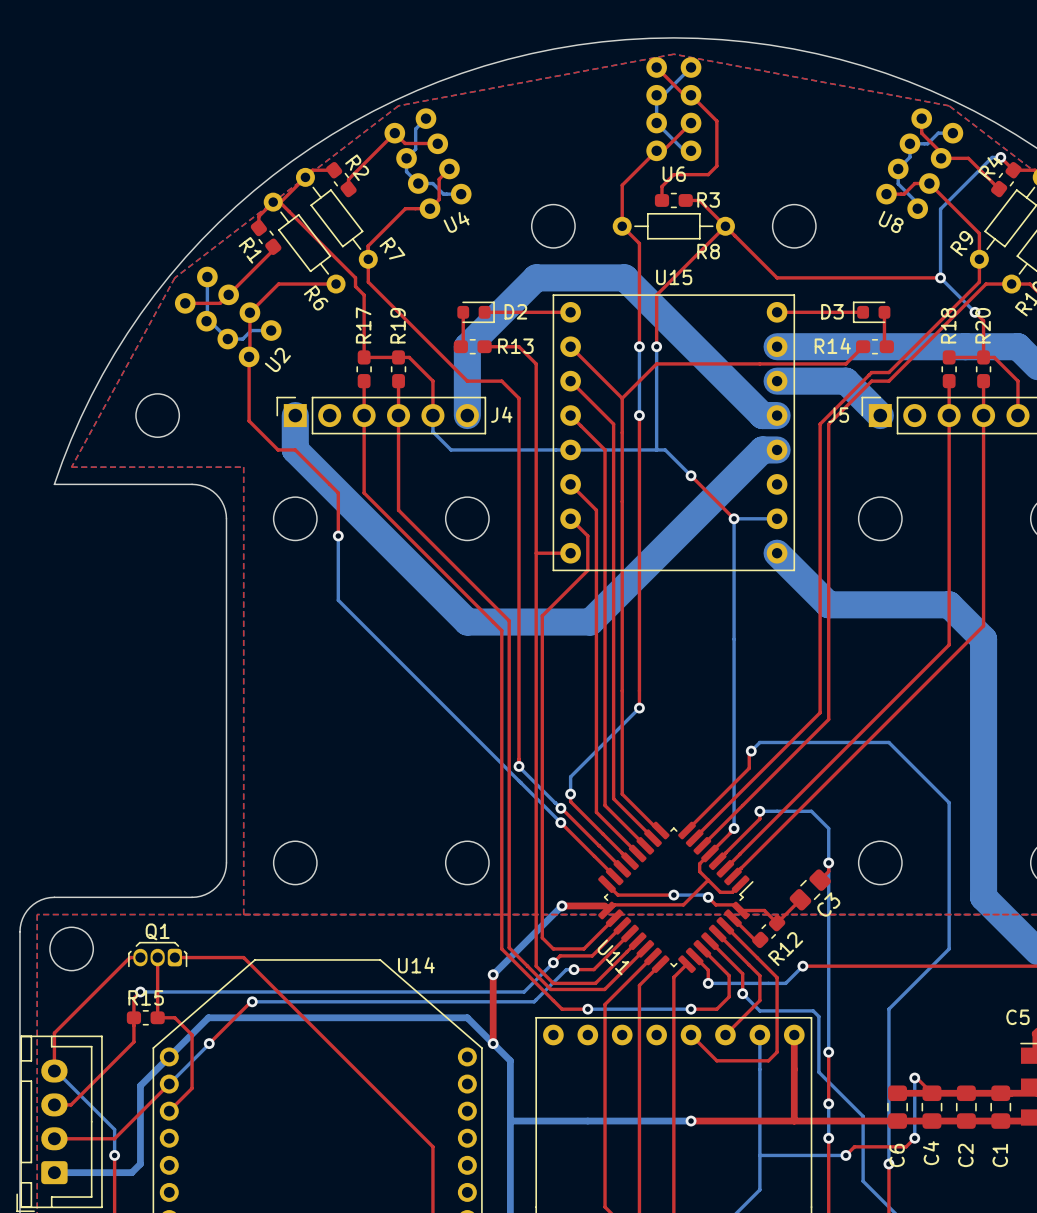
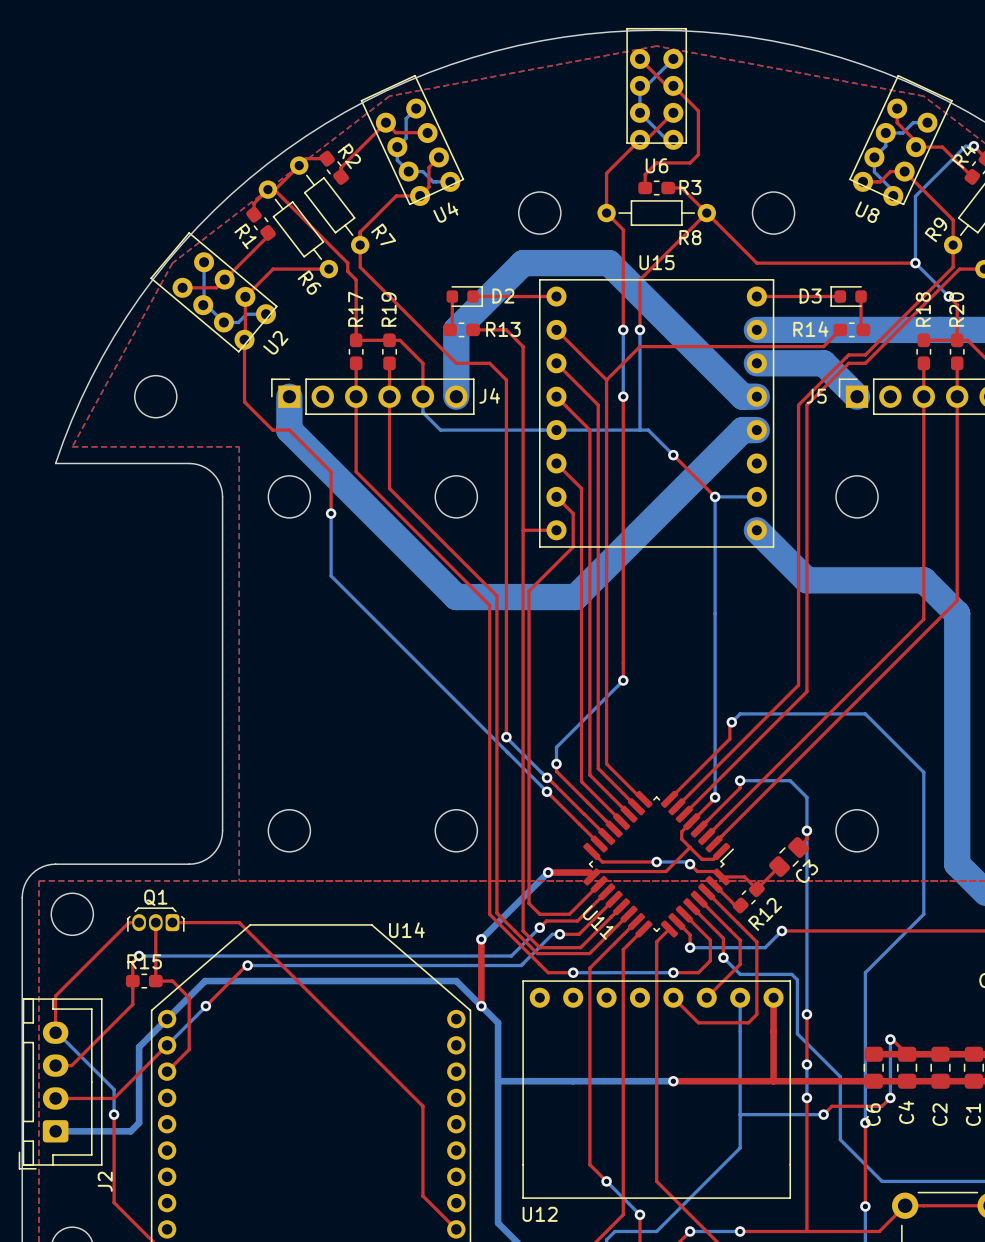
U6 footprint: [646, 57, 702, 134] -> [626, 27, 688, 144]
U4 footprint: [384, 108, 460, 194] -> [360, 74, 465, 206]
U8 footprint: [887, 108, 964, 194] -> [849, 74, 953, 206]
U2 footprint: [174, 266, 261, 350] -> [150, 232, 278, 353]

